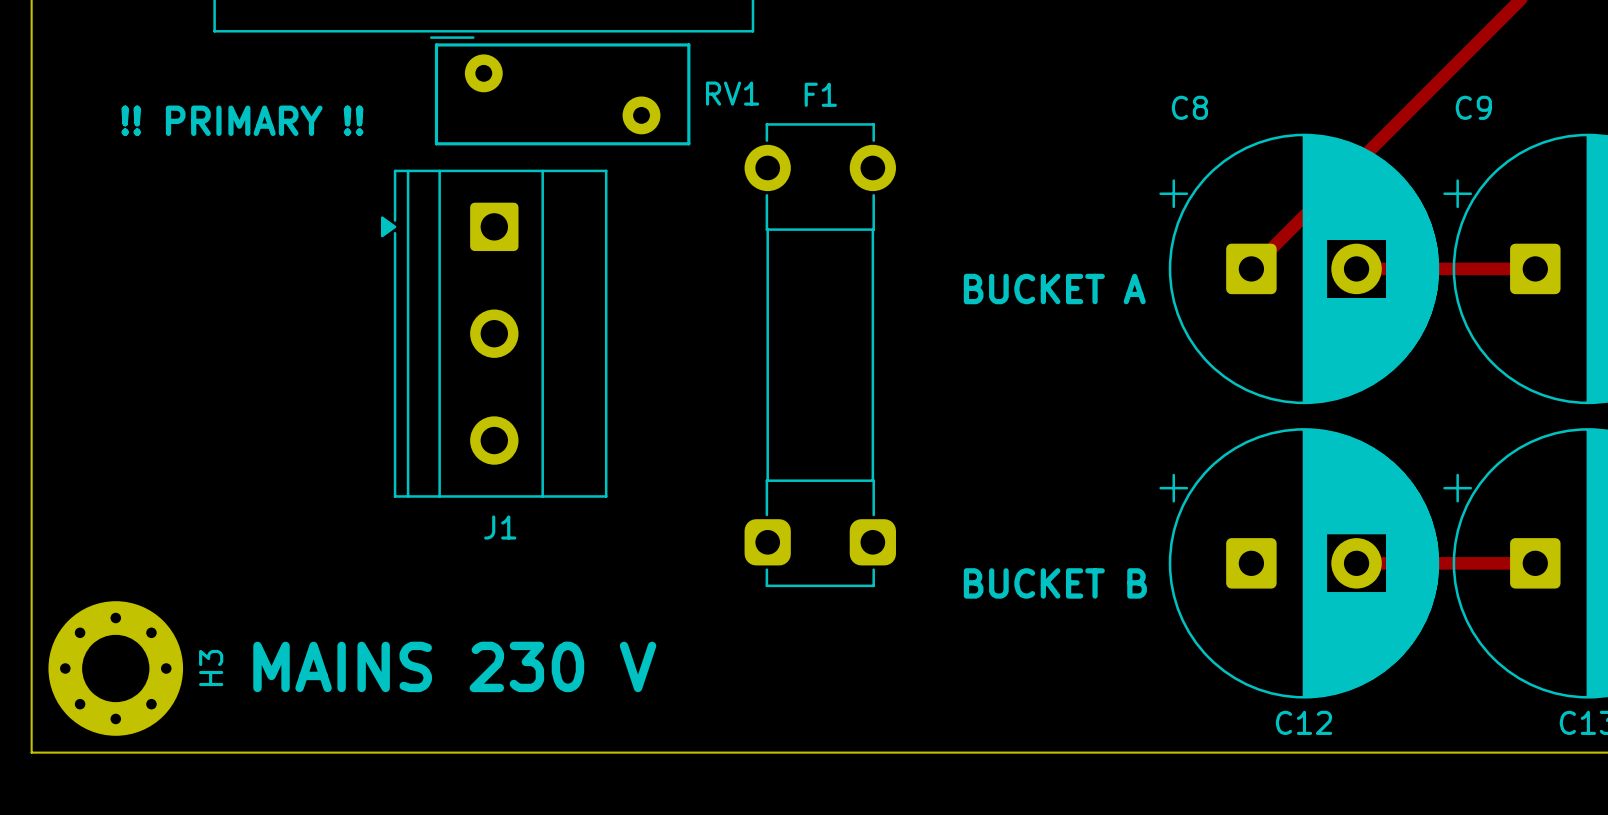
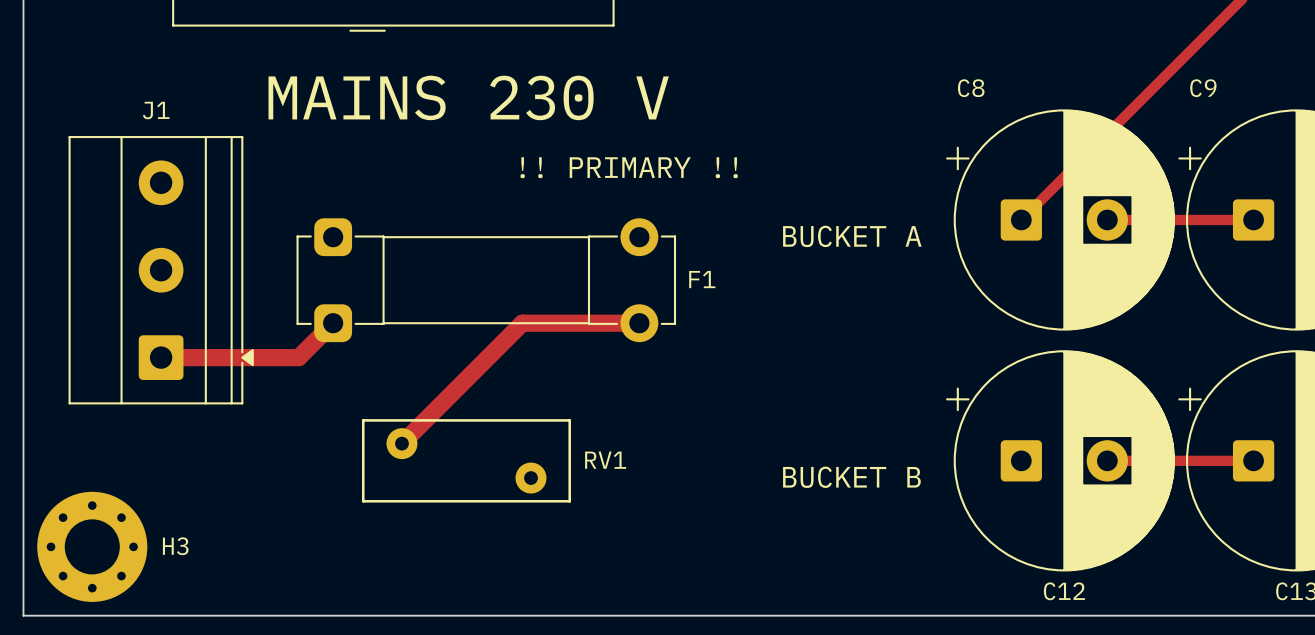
RV1 position: (562, 94) -> (466, 460)
text: none -> MAINS 230 V (468, 97)
text position: !! PRIMARY !! (242, 120) -> !! PRIMARY !! (629, 167)
J1 footprint: [380, 169, 608, 498] -> [68, 136, 254, 405]
F1 rotation: 0° (820, 355) -> 90° clockwise (486, 280)
track: none -> (333, 323) (298, 357) (161, 357)
track: none -> (639, 323) (522, 323) (401, 443)
J1 name position: J1 (500, 527) -> J1 (156, 110)
text: MAINS 230 V (454, 666) -> none
H3 name rotation: 0° (211, 667) -> 90° clockwise (175, 546)

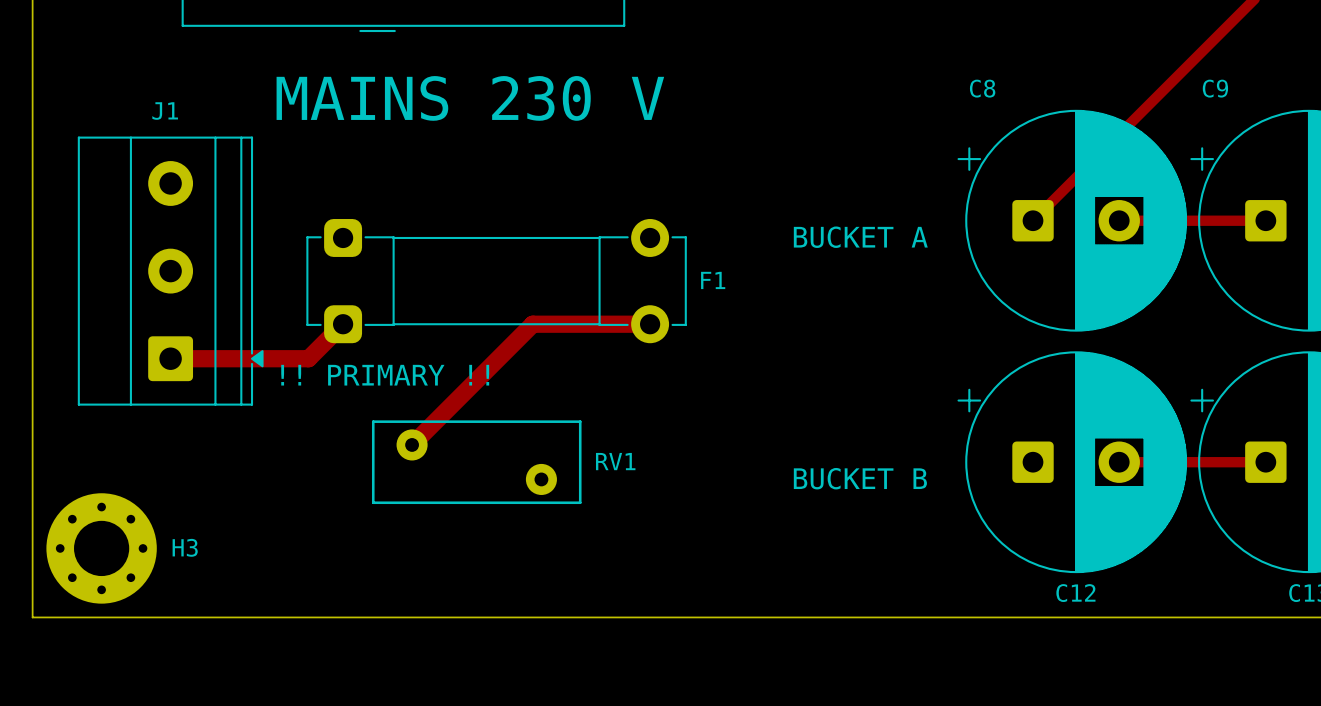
text position: !! PRIMARY !! (629, 167) -> !! PRIMARY !! (385, 375)

